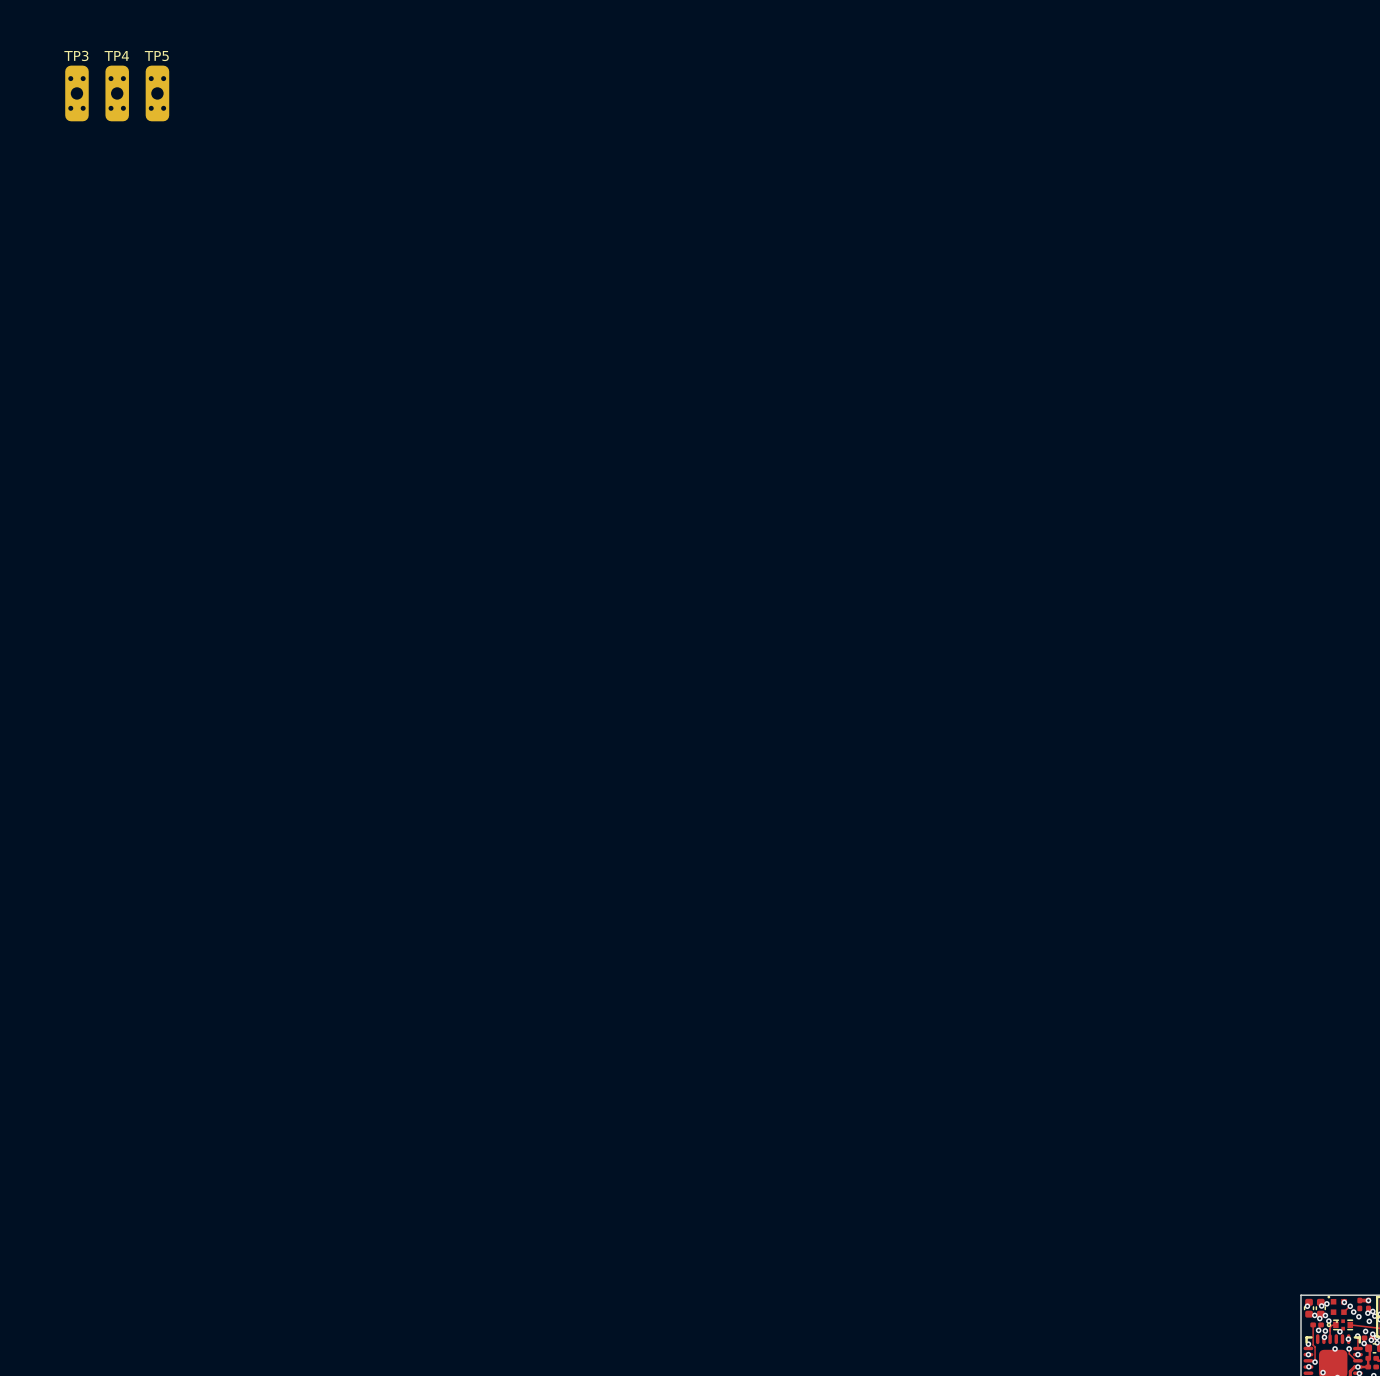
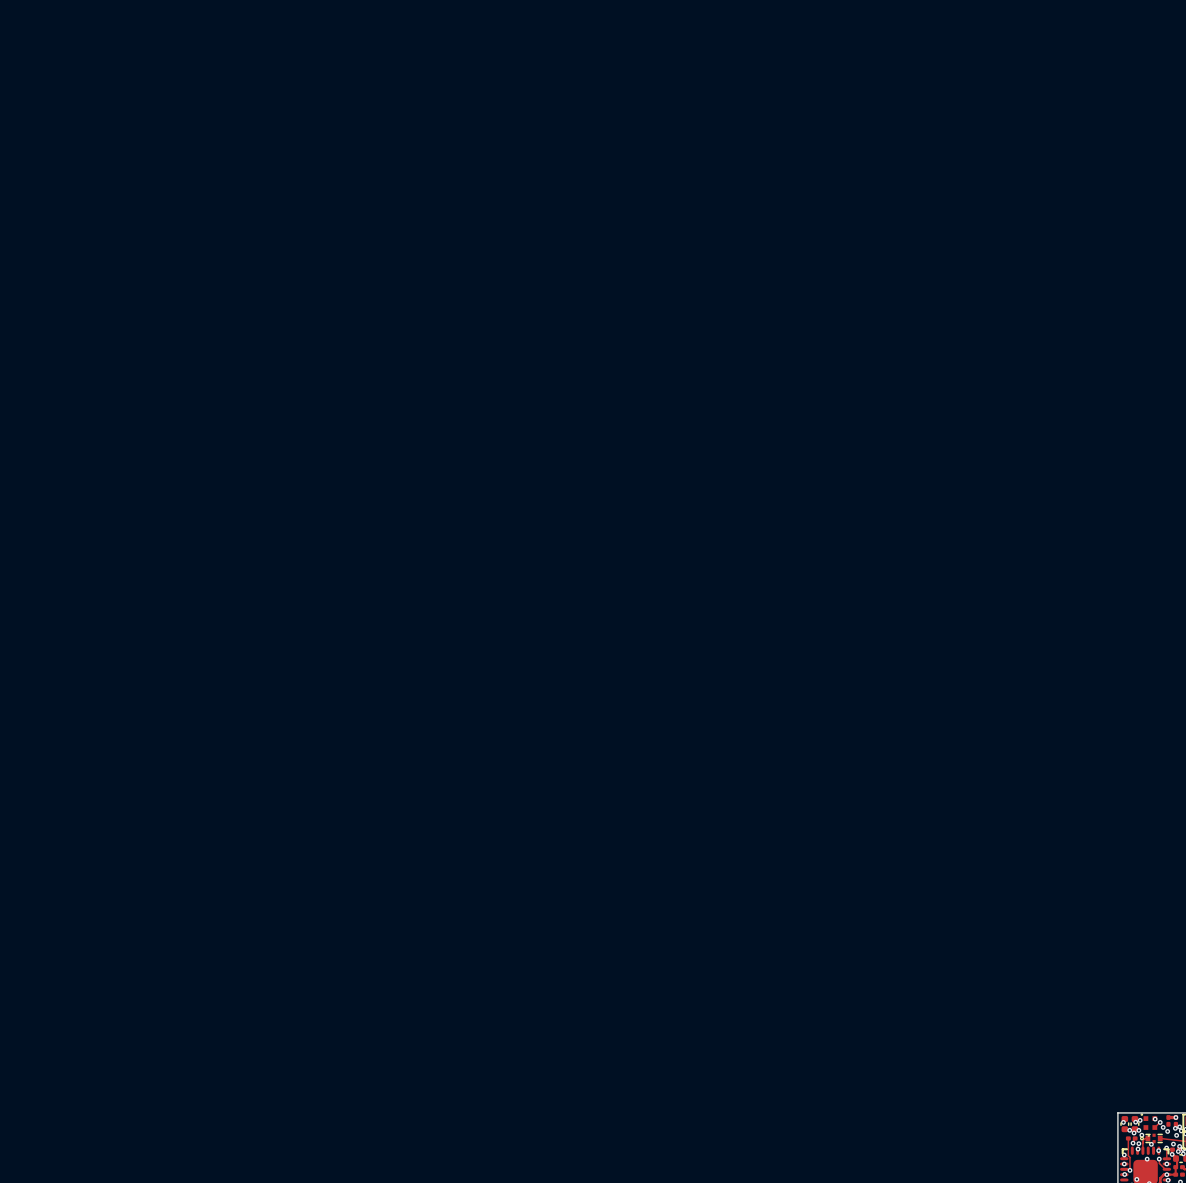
TP3: (76, 93) -> none
TP4: (117, 93) -> none
TP5: (157, 93) -> none

